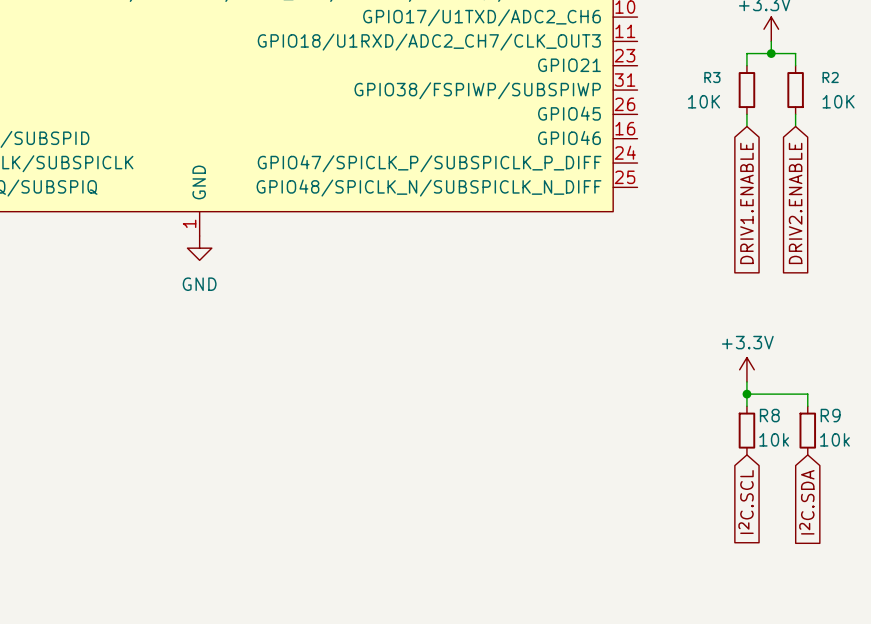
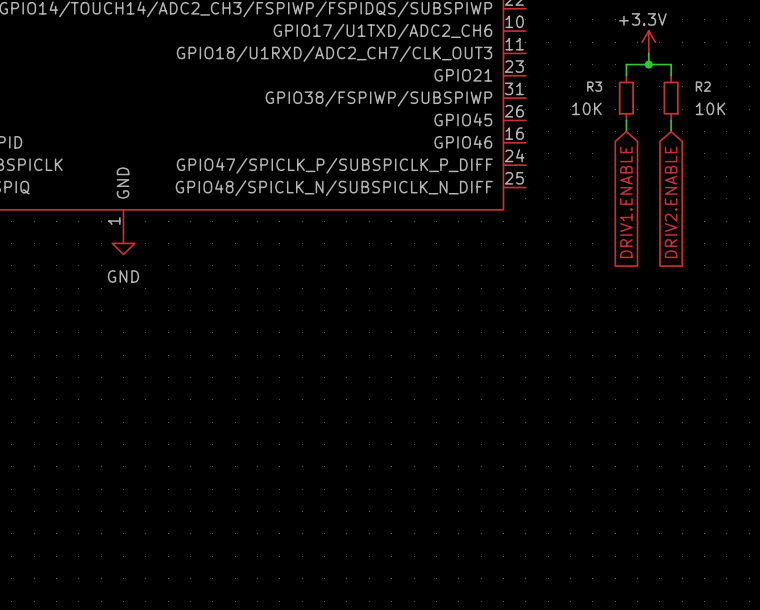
power symbol: +3.3V (746, 369) -> none
wire: (746, 381) (746, 406) -> none
wire: (746, 394) (807, 394) (807, 406) -> none
junction: (746, 394) -> none
R8: 10k (746, 430) -> none
R9: 10k (807, 430) -> none
global label: I2C.SCL (746, 502) -> none
global label: I2C.SDA (806, 502) -> none

